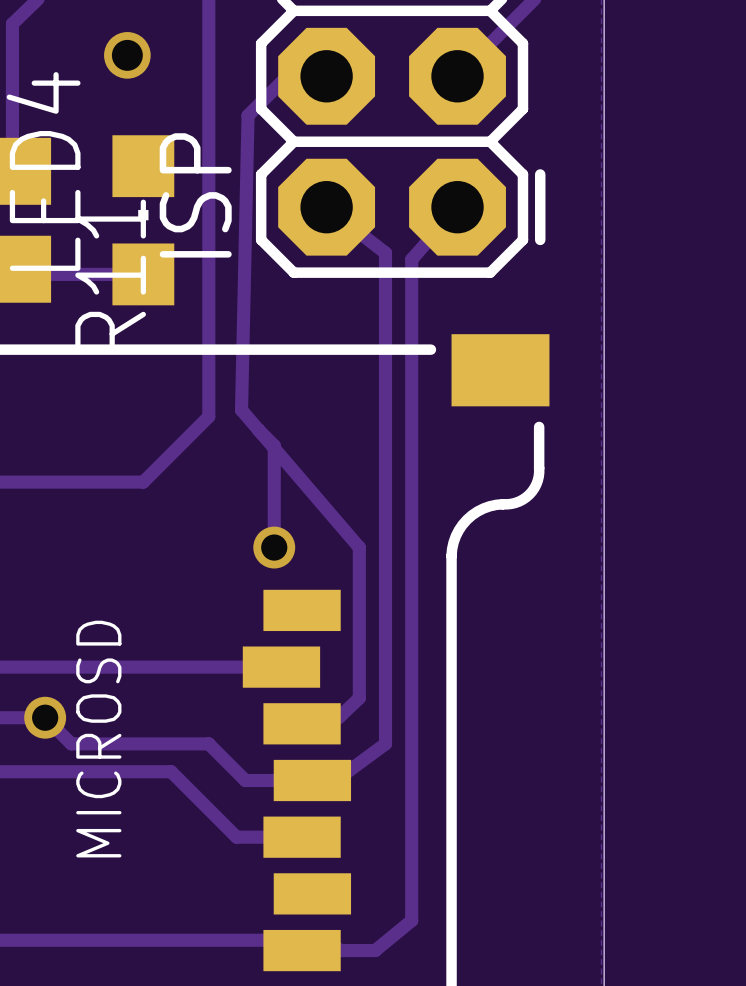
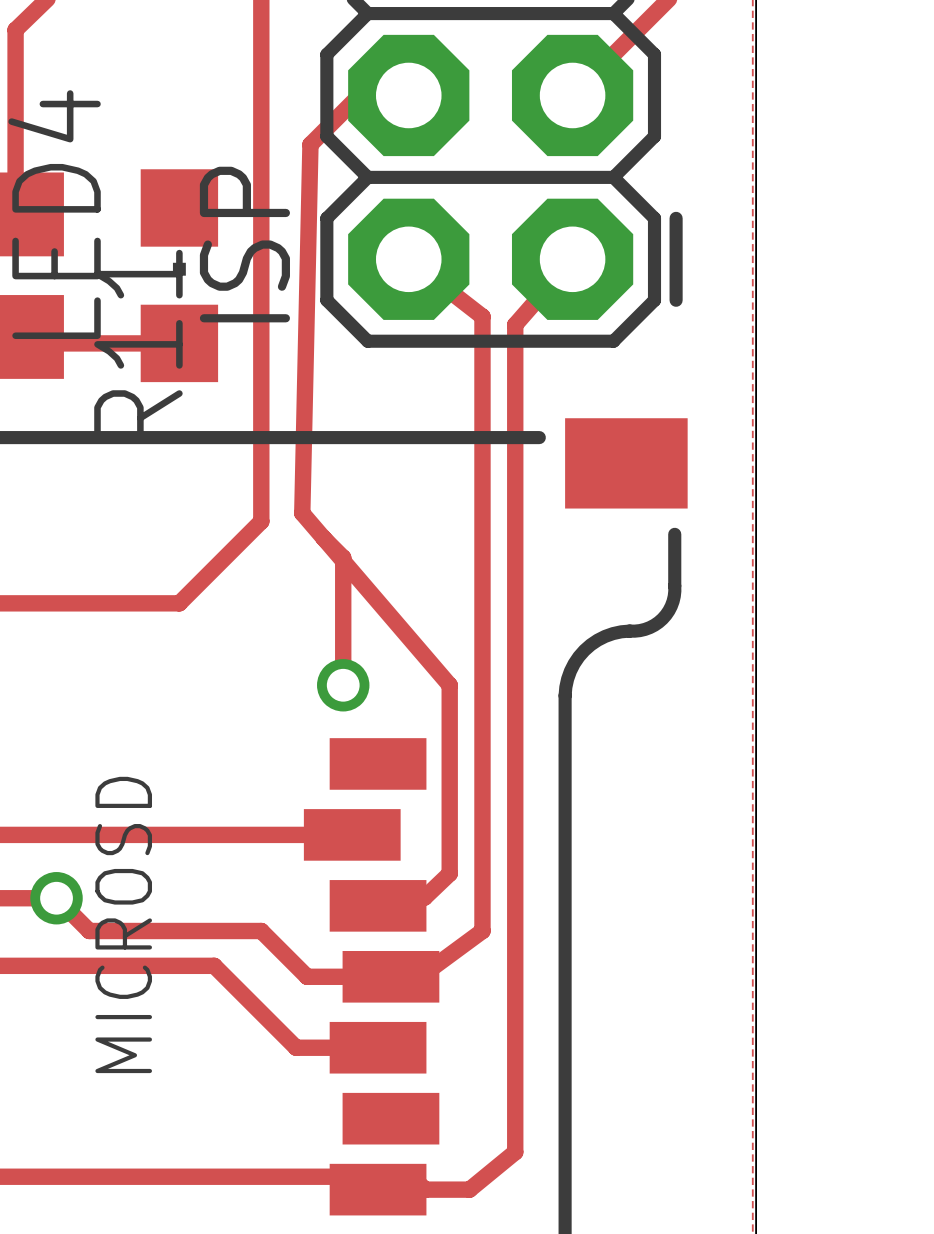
via: (127, 55) -> none

